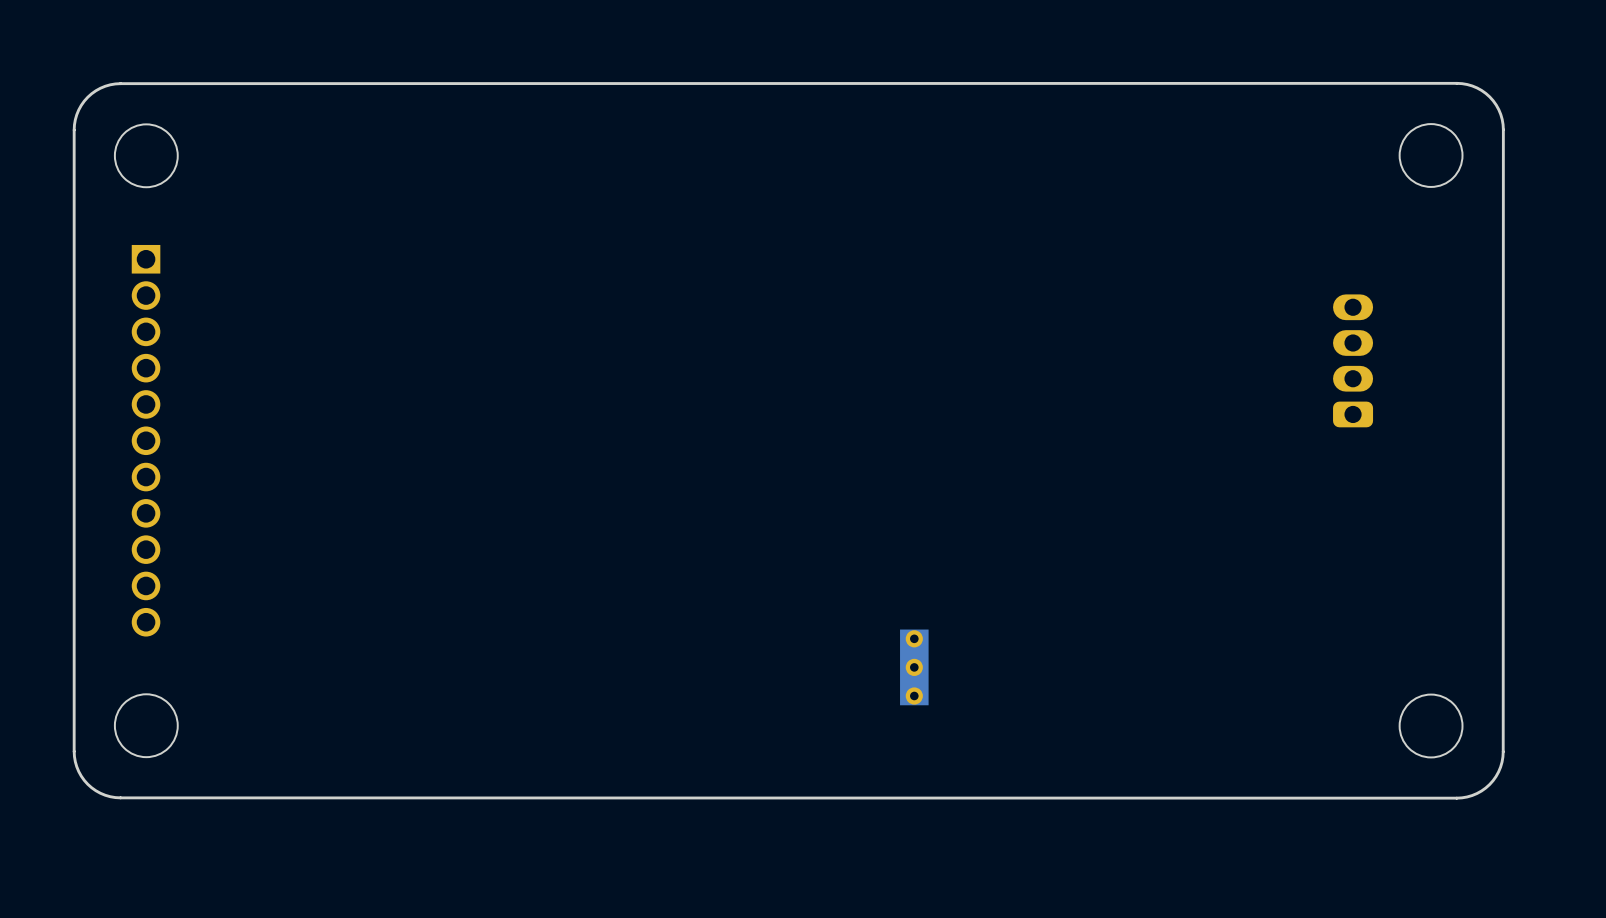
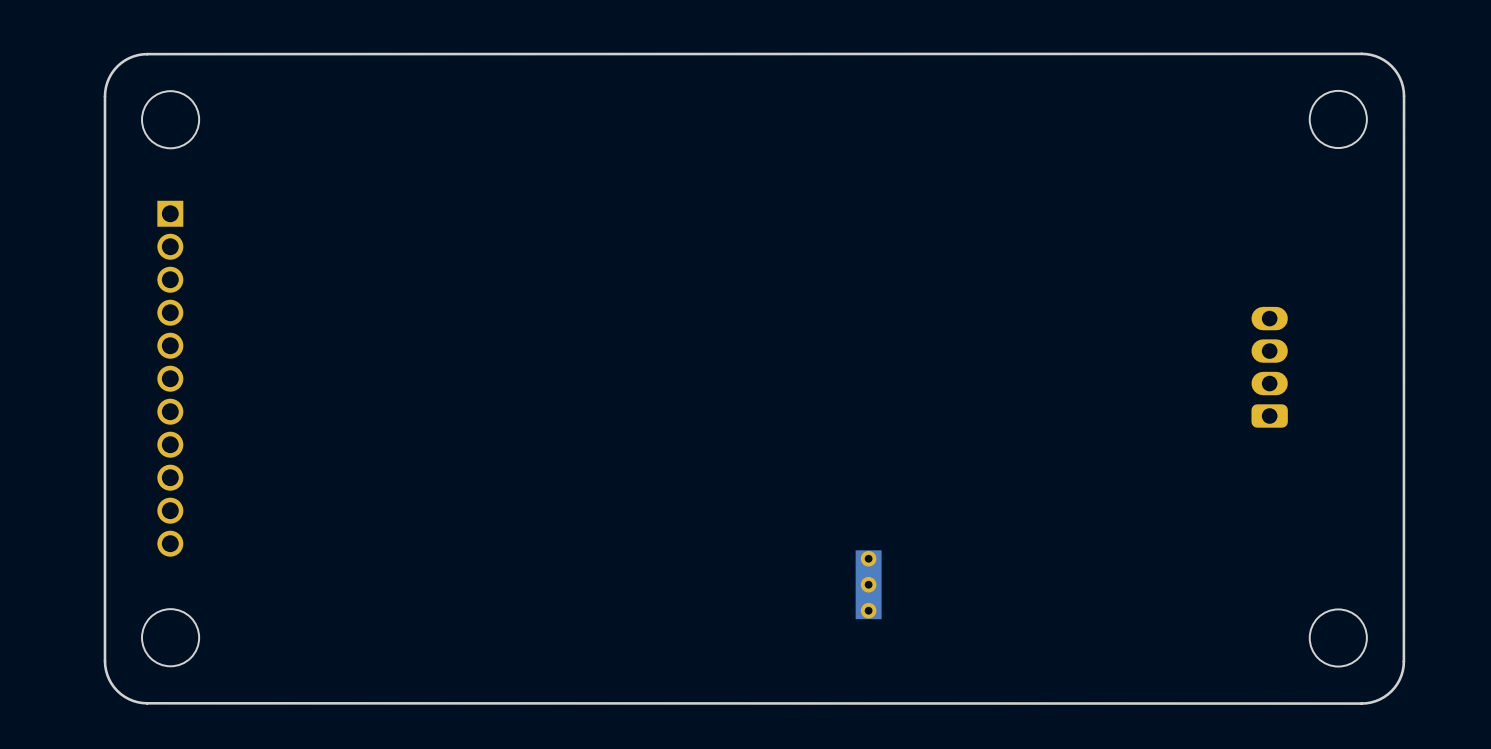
part position: (1353, 360) -> (1269, 367)

